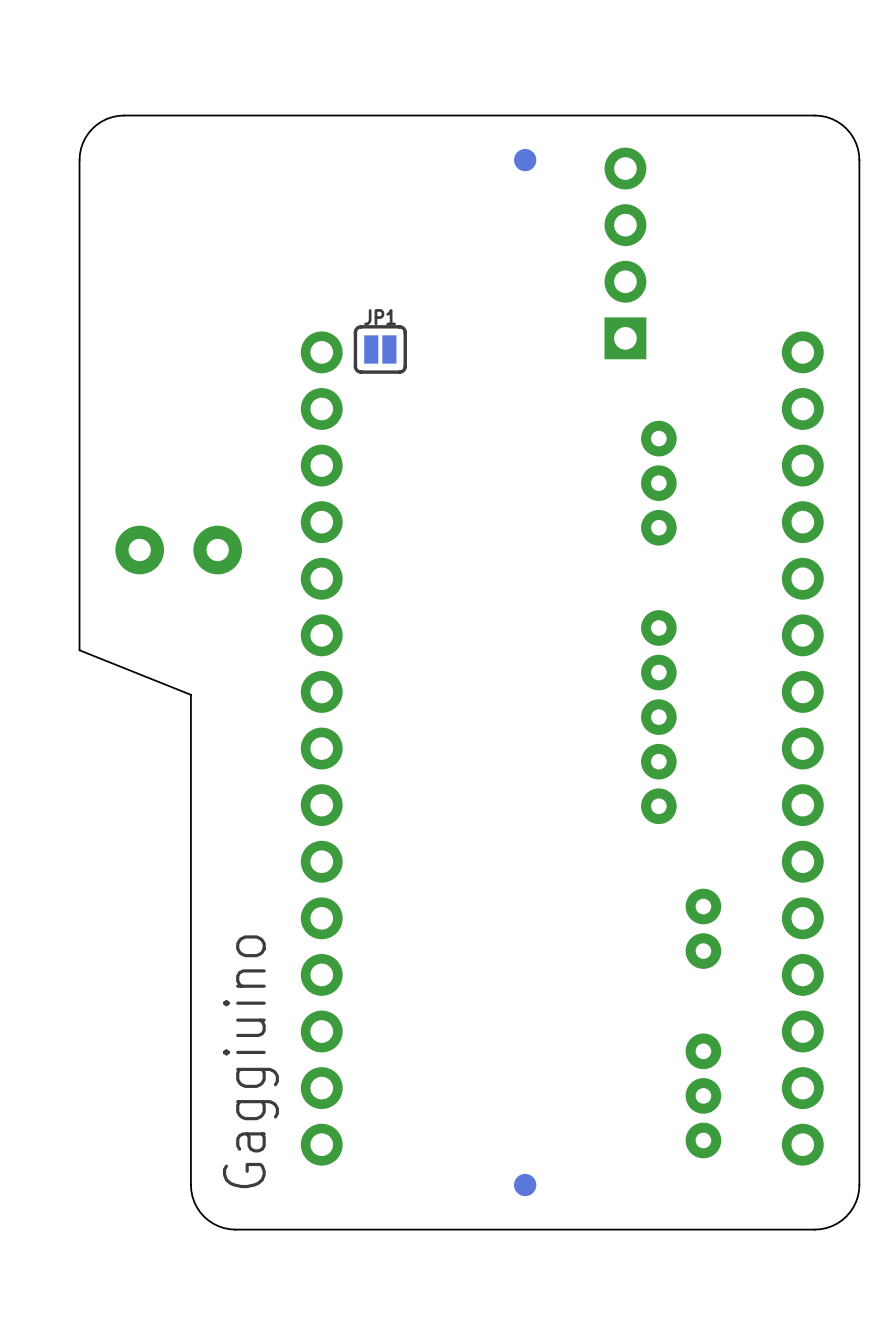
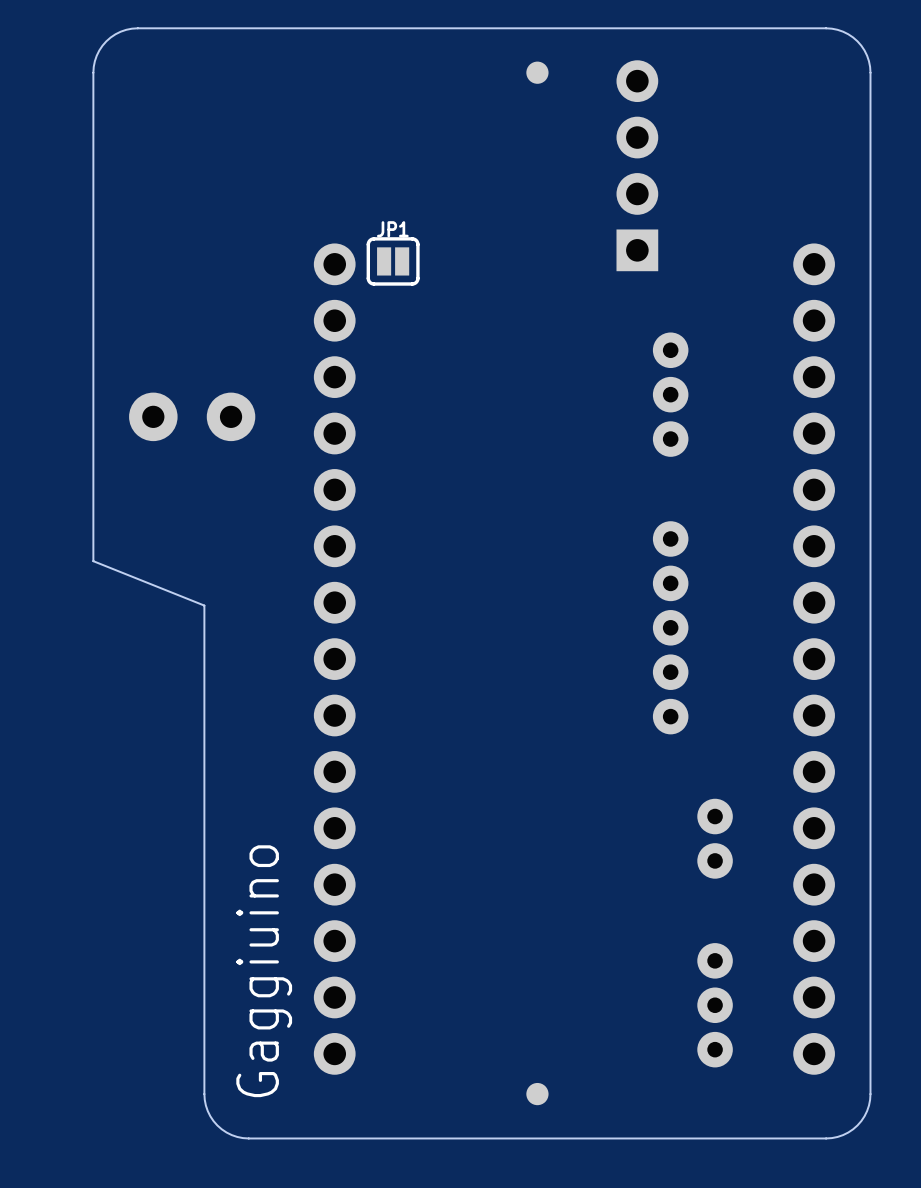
part position: (178, 550) -> (192, 416)

